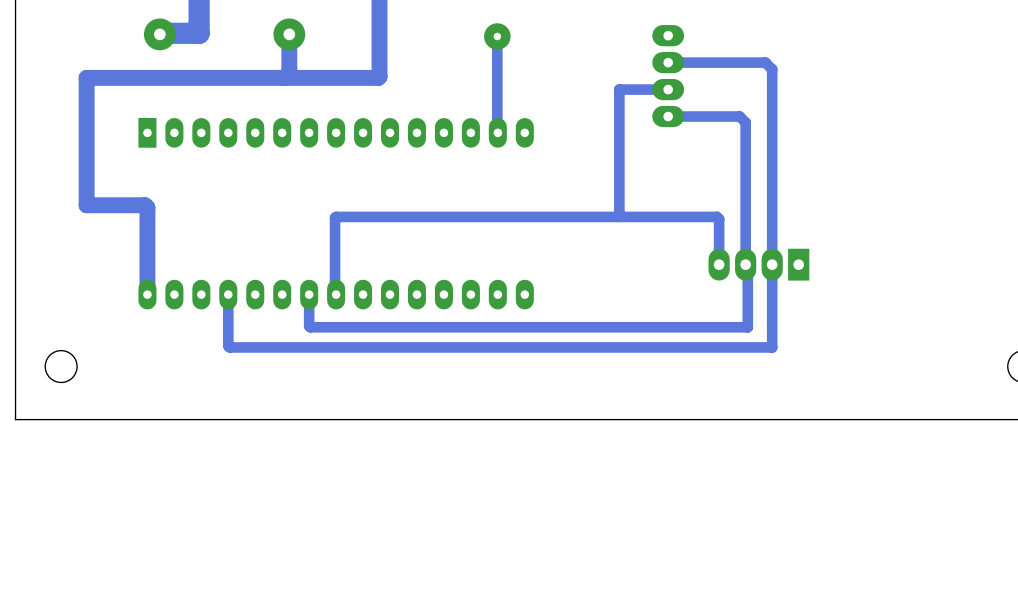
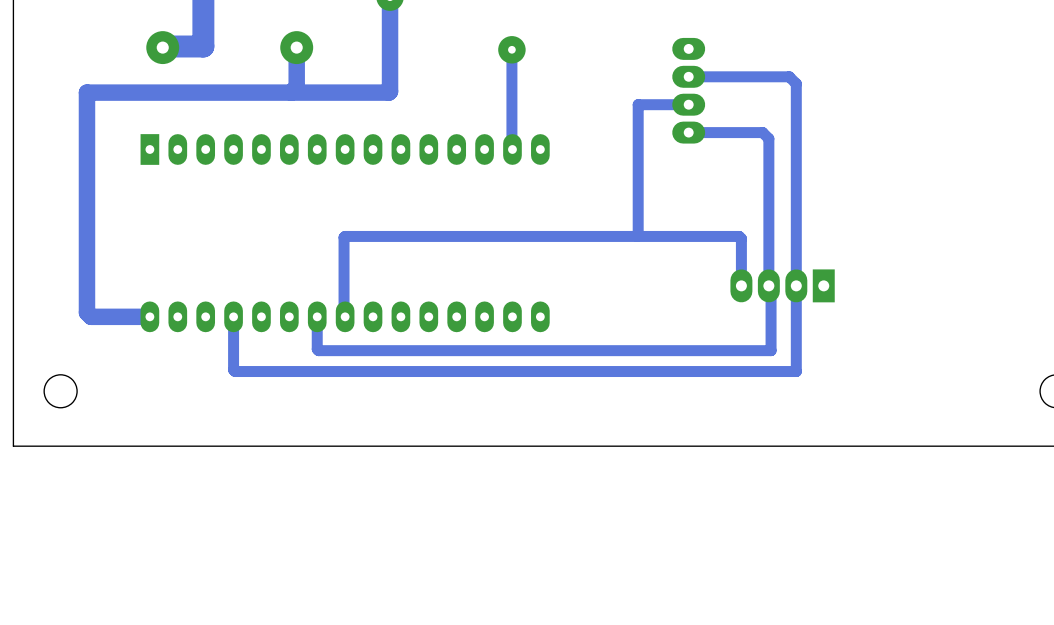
bottom track: (86, 205) (145, 205) (147, 207) (147, 294) -> (86, 224) (86, 312) (91, 316) (149, 316)

